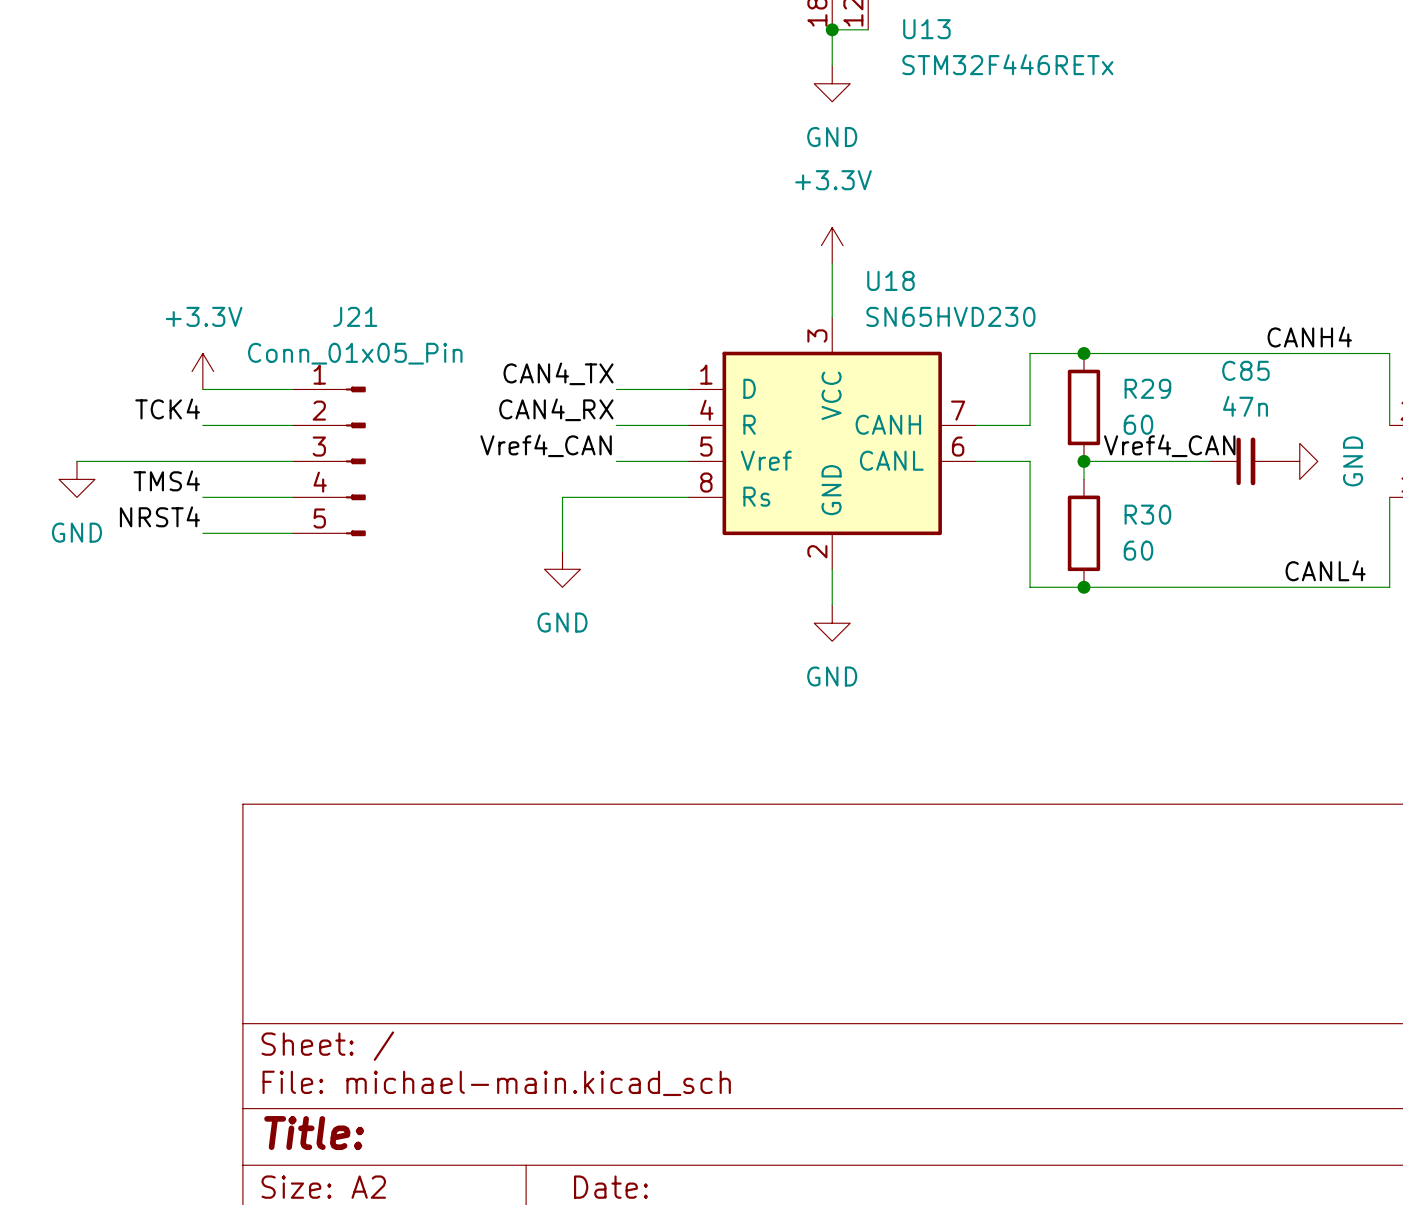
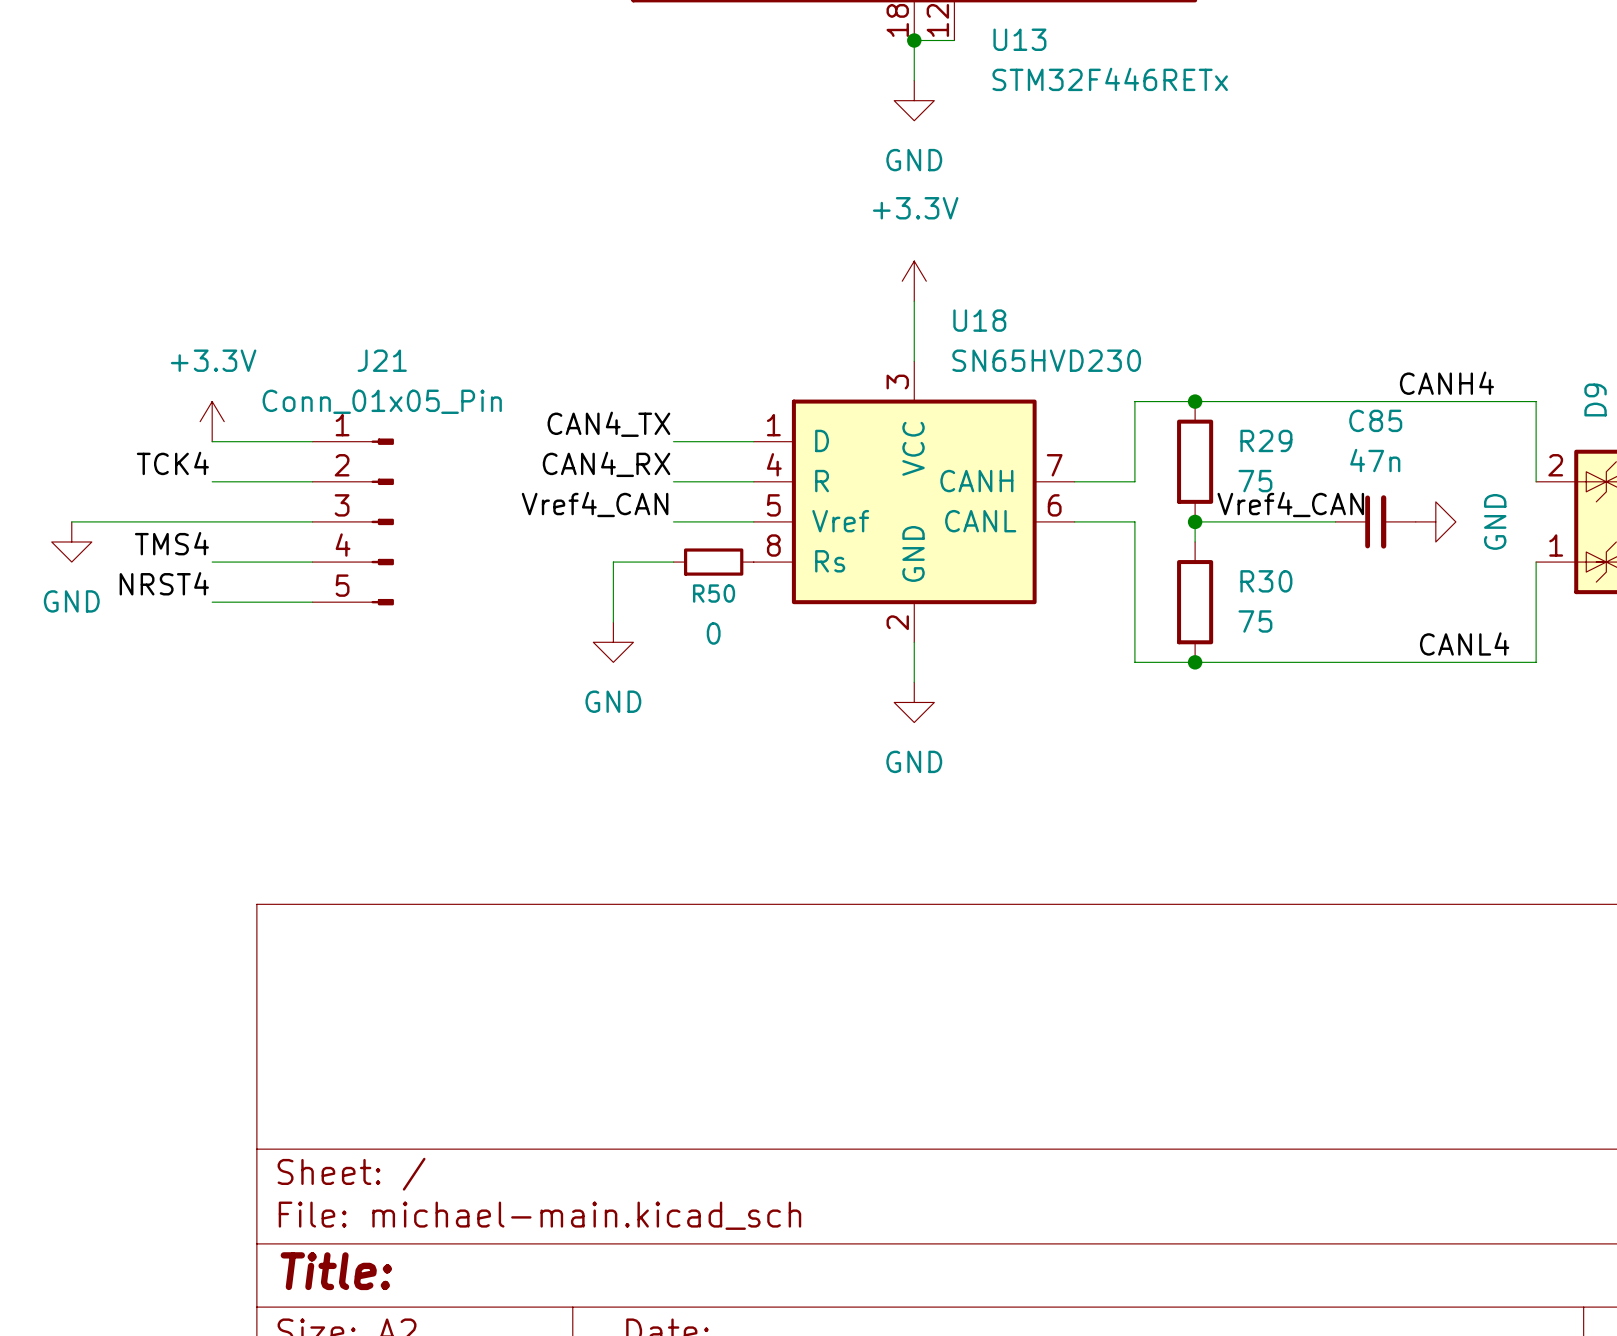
R29 value: 60 (1138, 424) -> 75 (1255, 481)
wire: (616, 497) (688, 497) -> none
R50: none -> 0 (713, 562)
R30 value: 60 (1138, 550) -> 75 (1255, 621)

